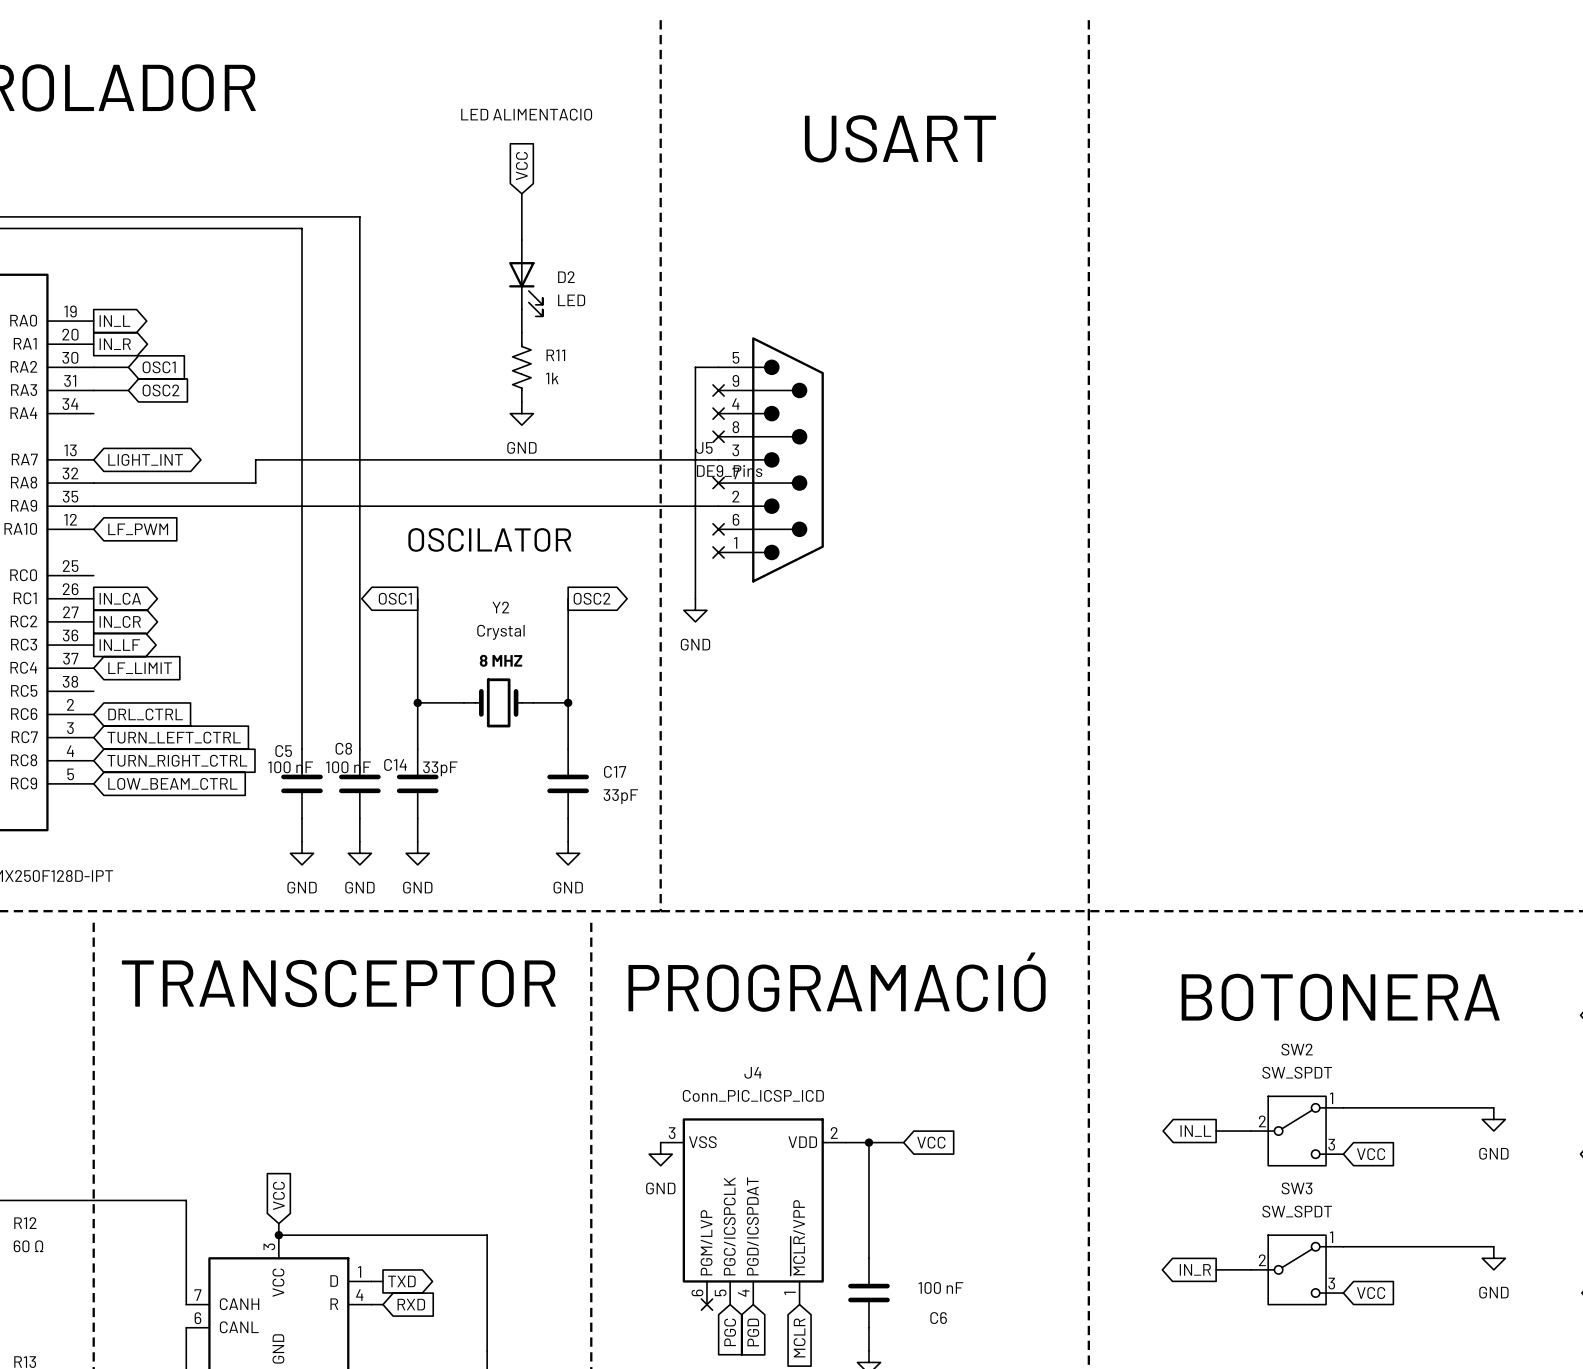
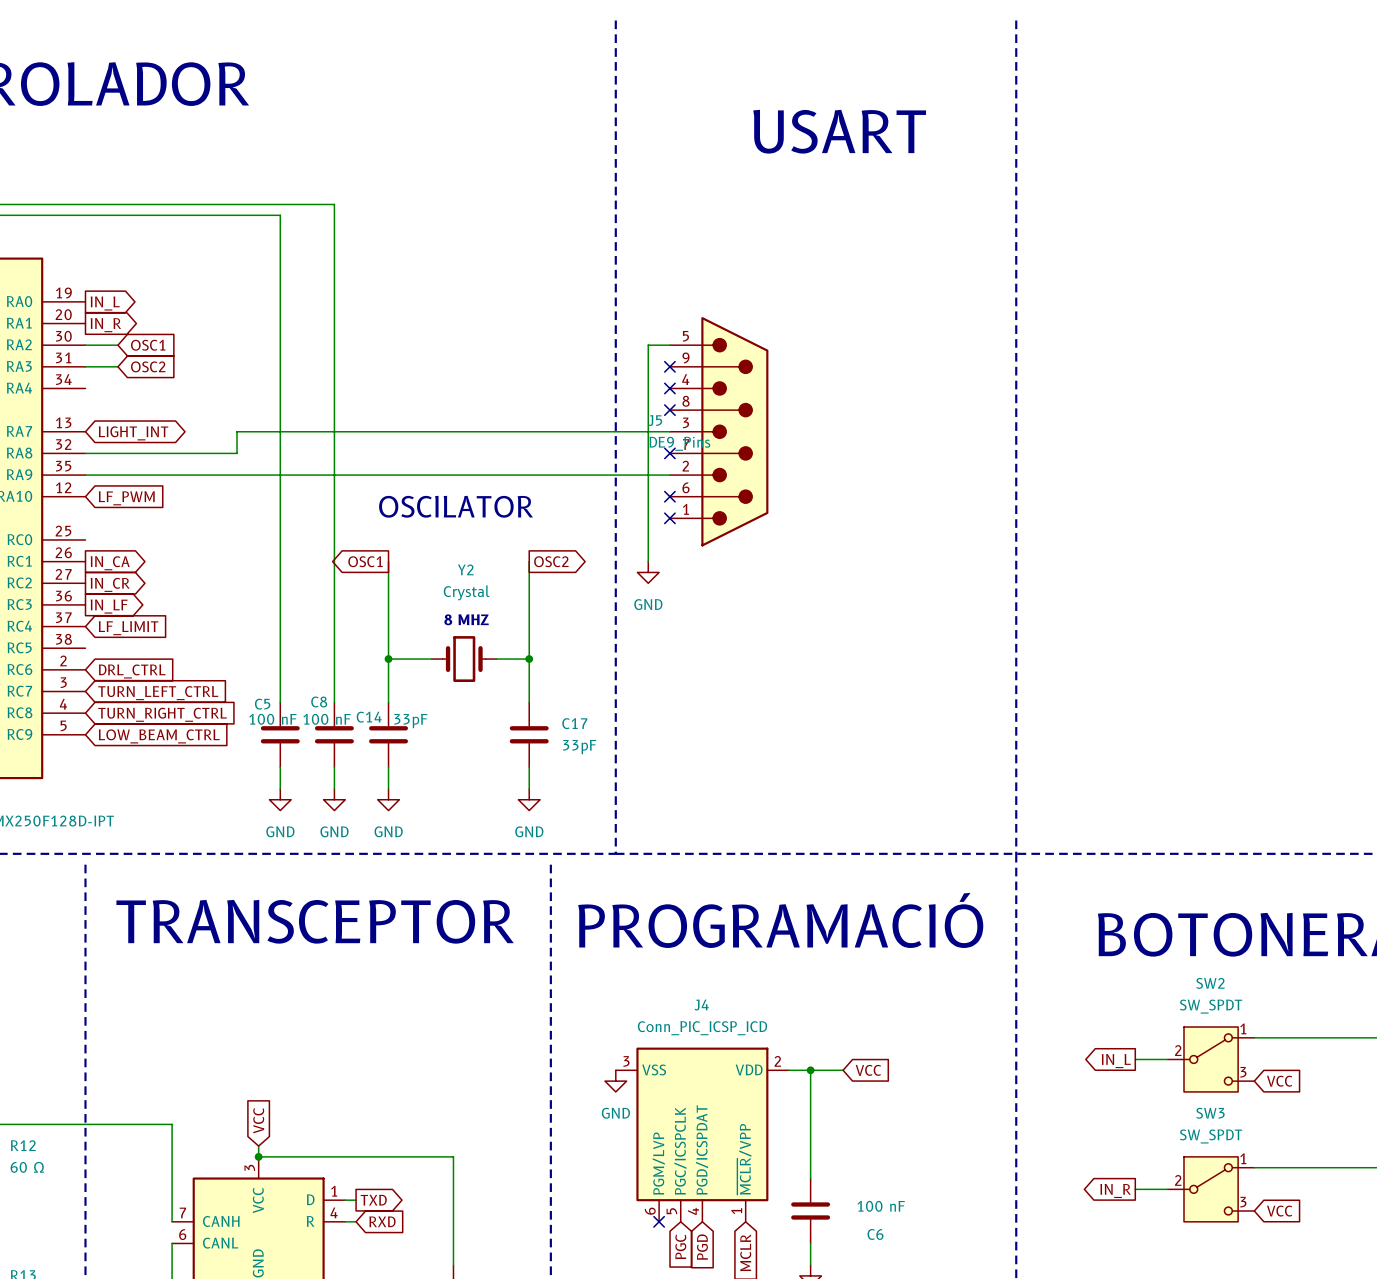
text: LED ALIMENTACIO (526, 114) -> none
global label: VCC (521, 166) -> none
wire: (521, 193) (521, 240) -> none
D2: LED (525, 278) -> none
wire: (521, 309) (521, 332) -> none
R11: 1k (521, 367) -> none
power symbol: GND (521, 413) -> none

